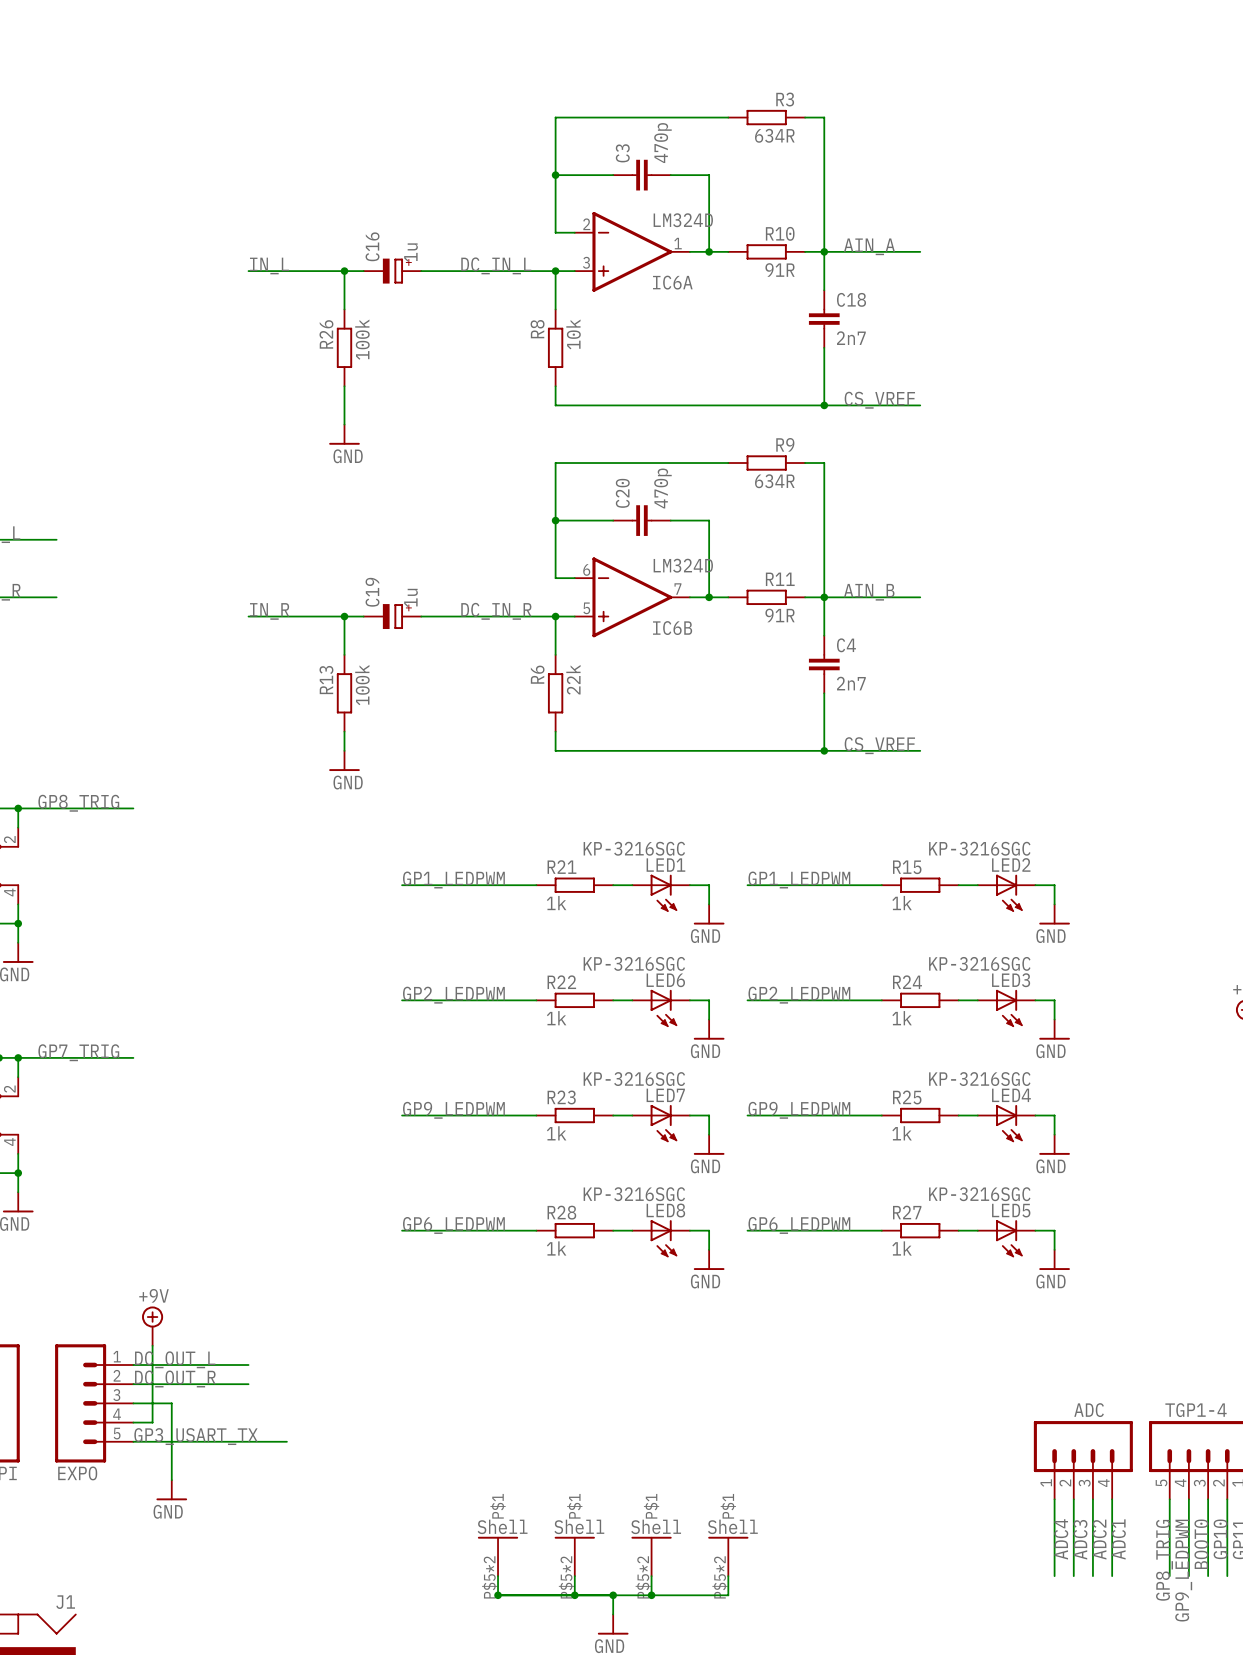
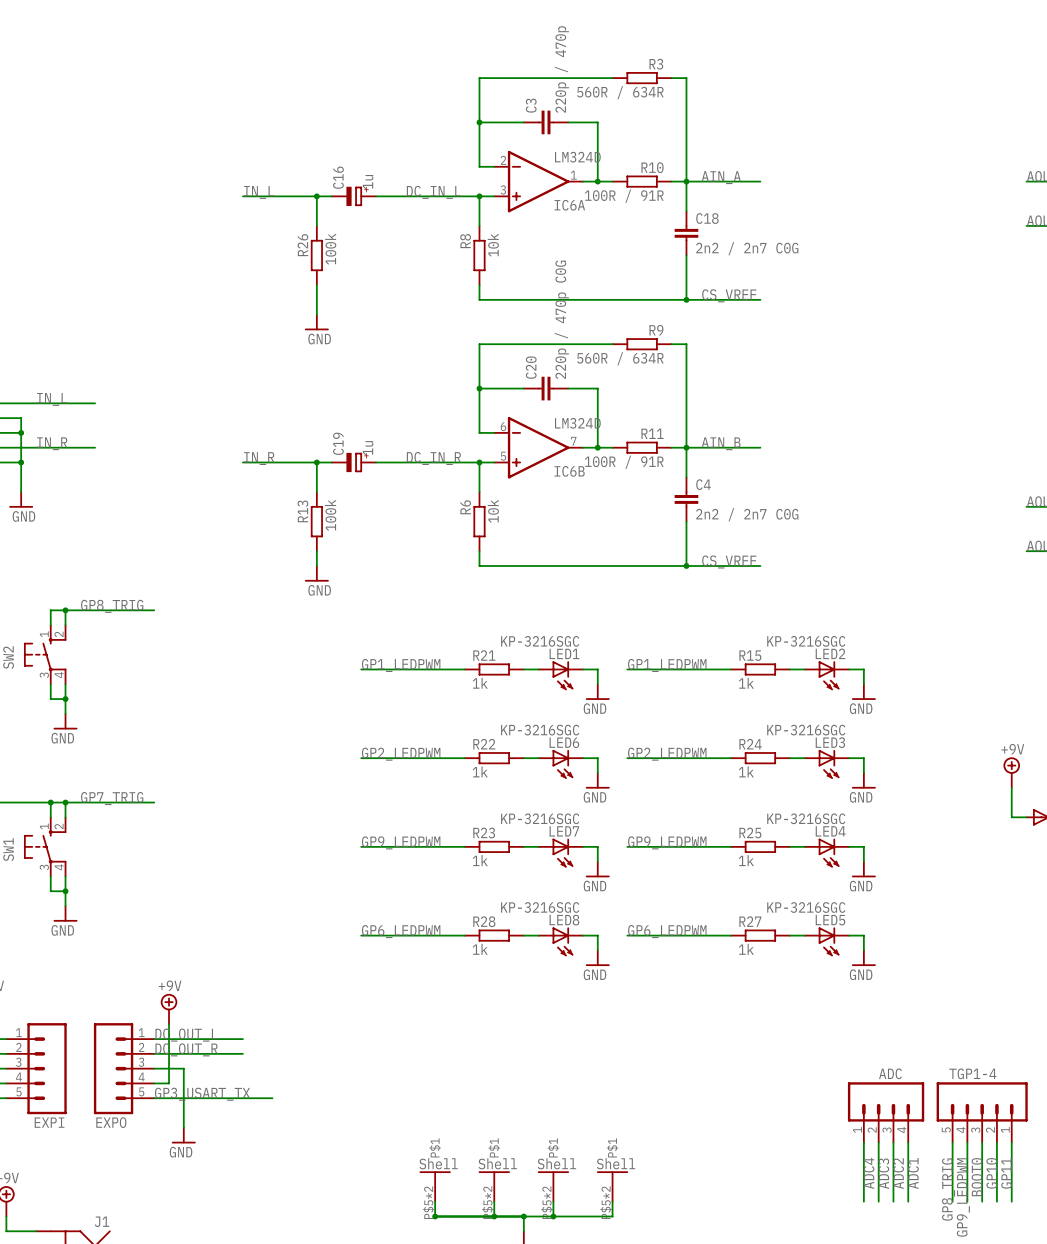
R3 value: 634R (774, 135) -> 560R / 634R (620, 92)
C3 value: 470p (662, 143) -> 220p / 470p (561, 69)
R10 value: 91R (780, 270) -> 100R / 91R (624, 196)
C18 value: 2n7 (851, 338) -> 2n2 / 2n7 C0G (747, 248)
R9 value: 634R (774, 481) -> 560R / 634R (620, 358)
C20 value: 470p (662, 488) -> 220p / 470p C0G (561, 319)
R11 value: 91R (780, 615) -> 100R / 91R (624, 462)
R6 value: 22k (573, 679) -> 10k (493, 511)
C4 value: 2n7 (851, 683) -> 2n2 / 2n7 C0G (747, 514)

